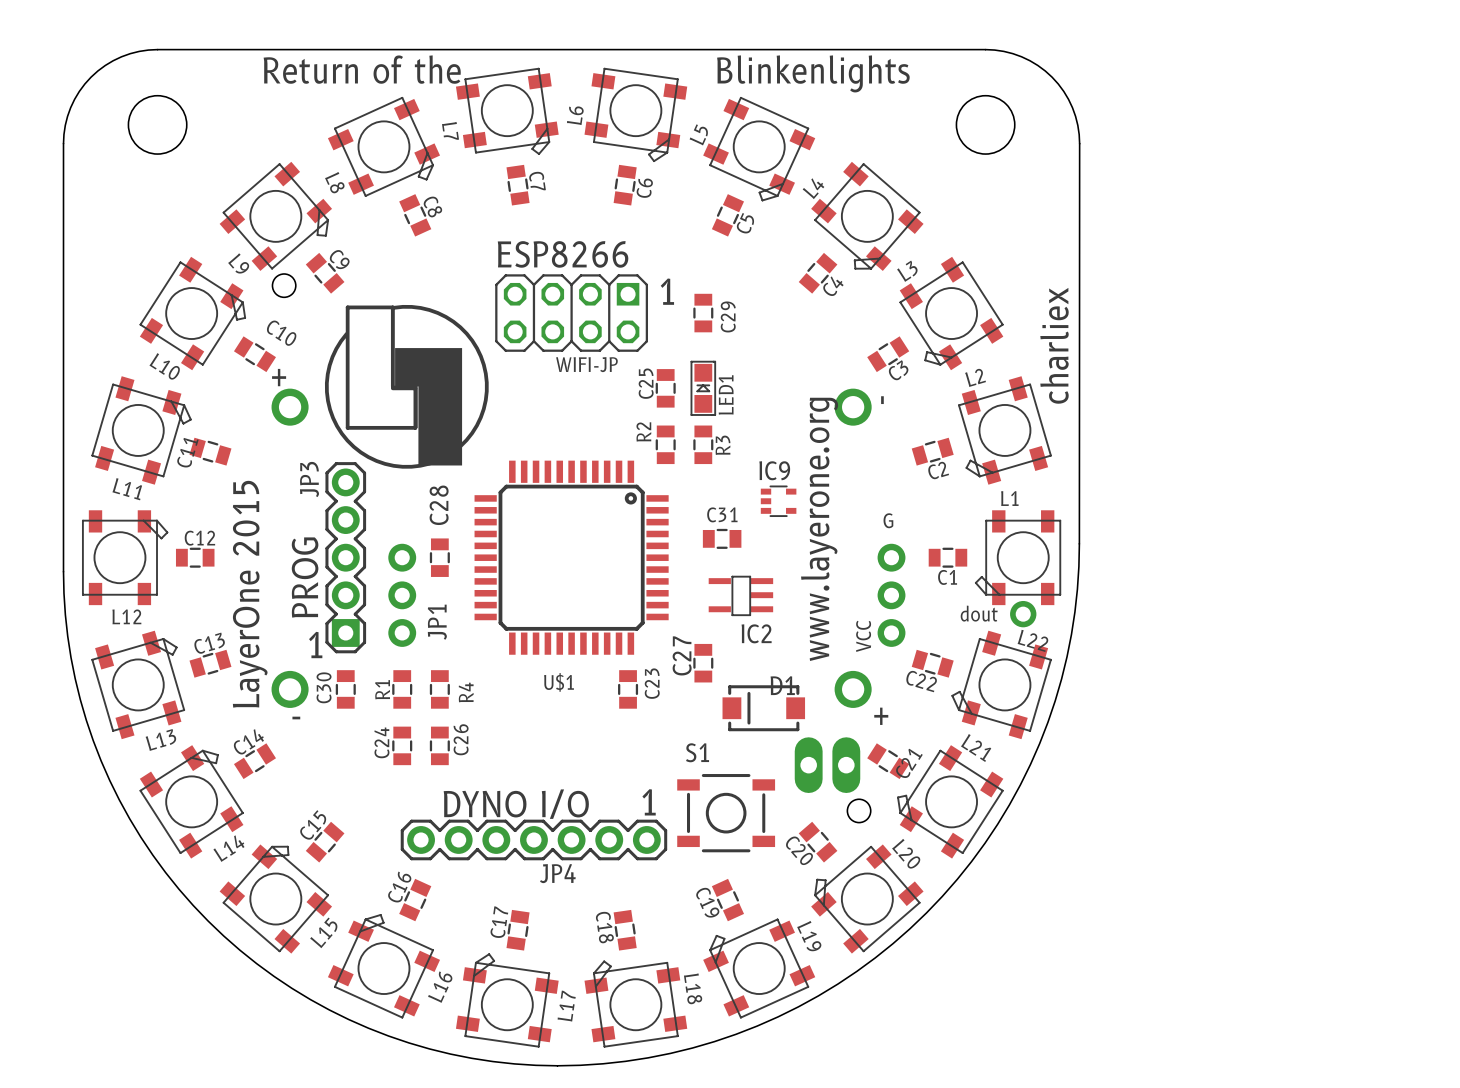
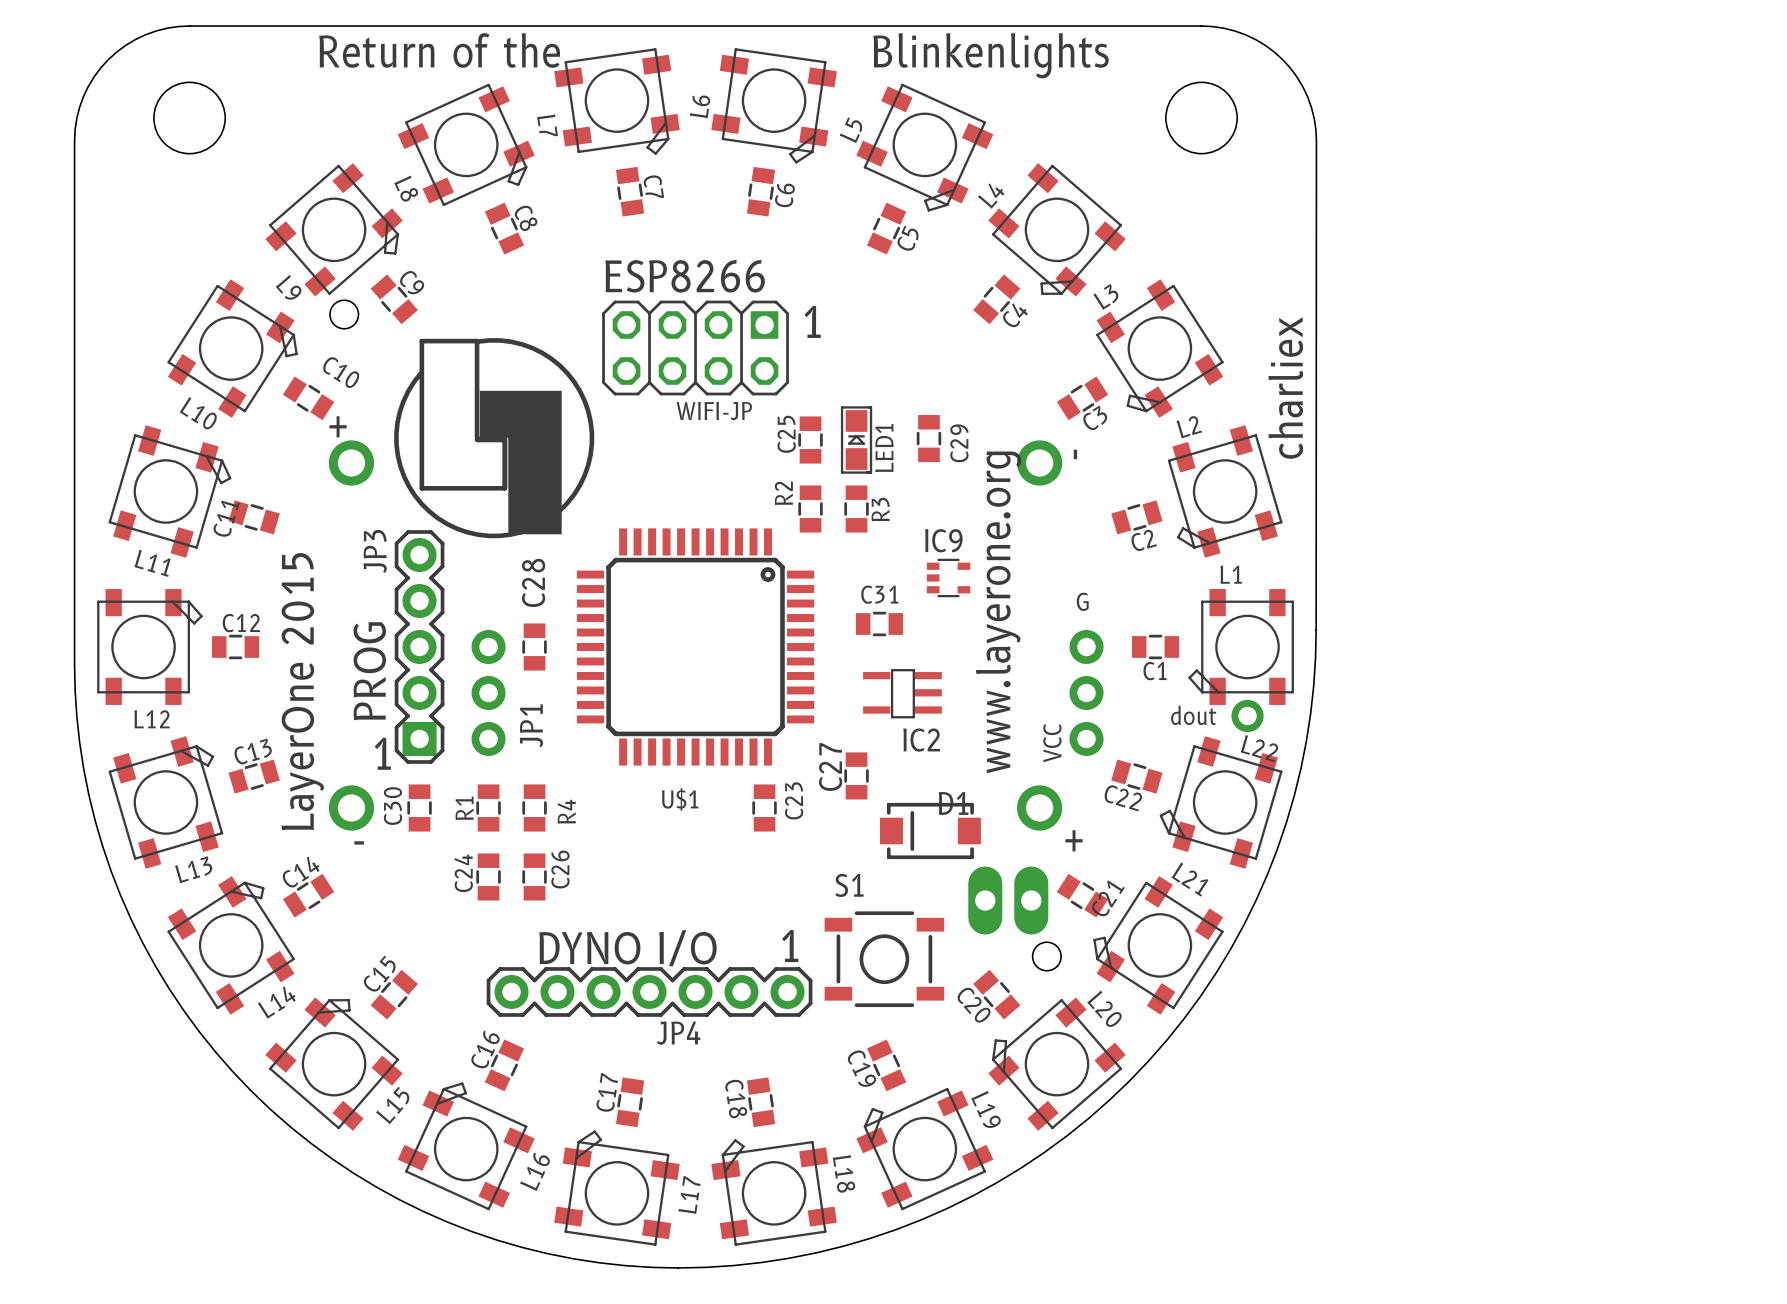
C29 position: (703, 313) -> (928, 438)

